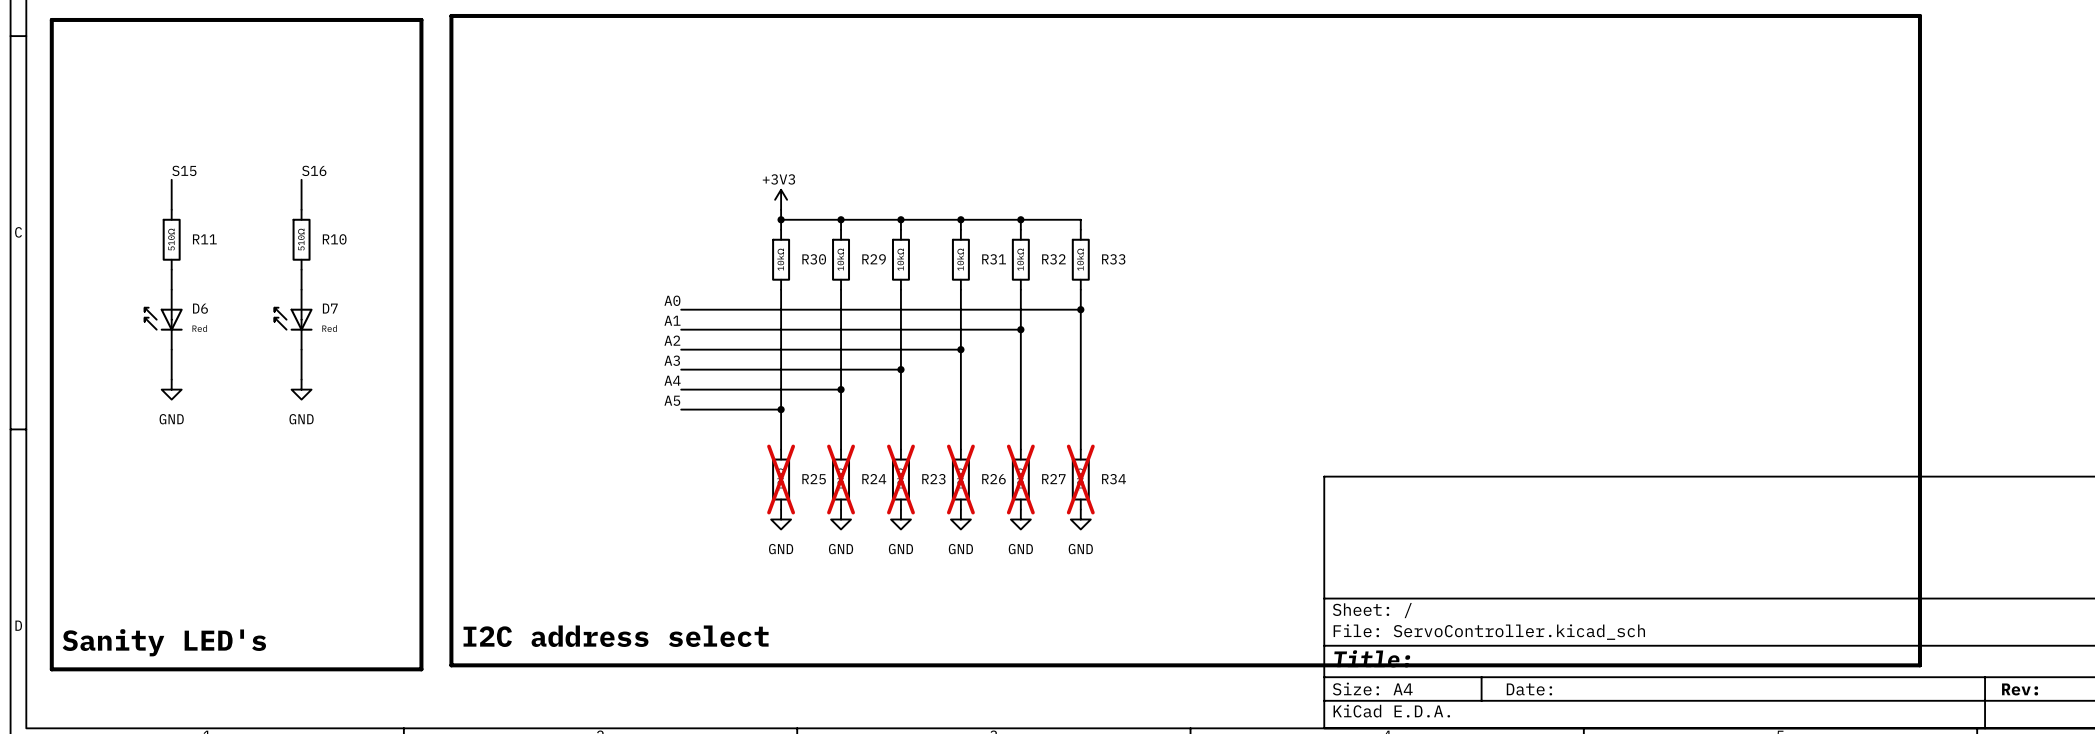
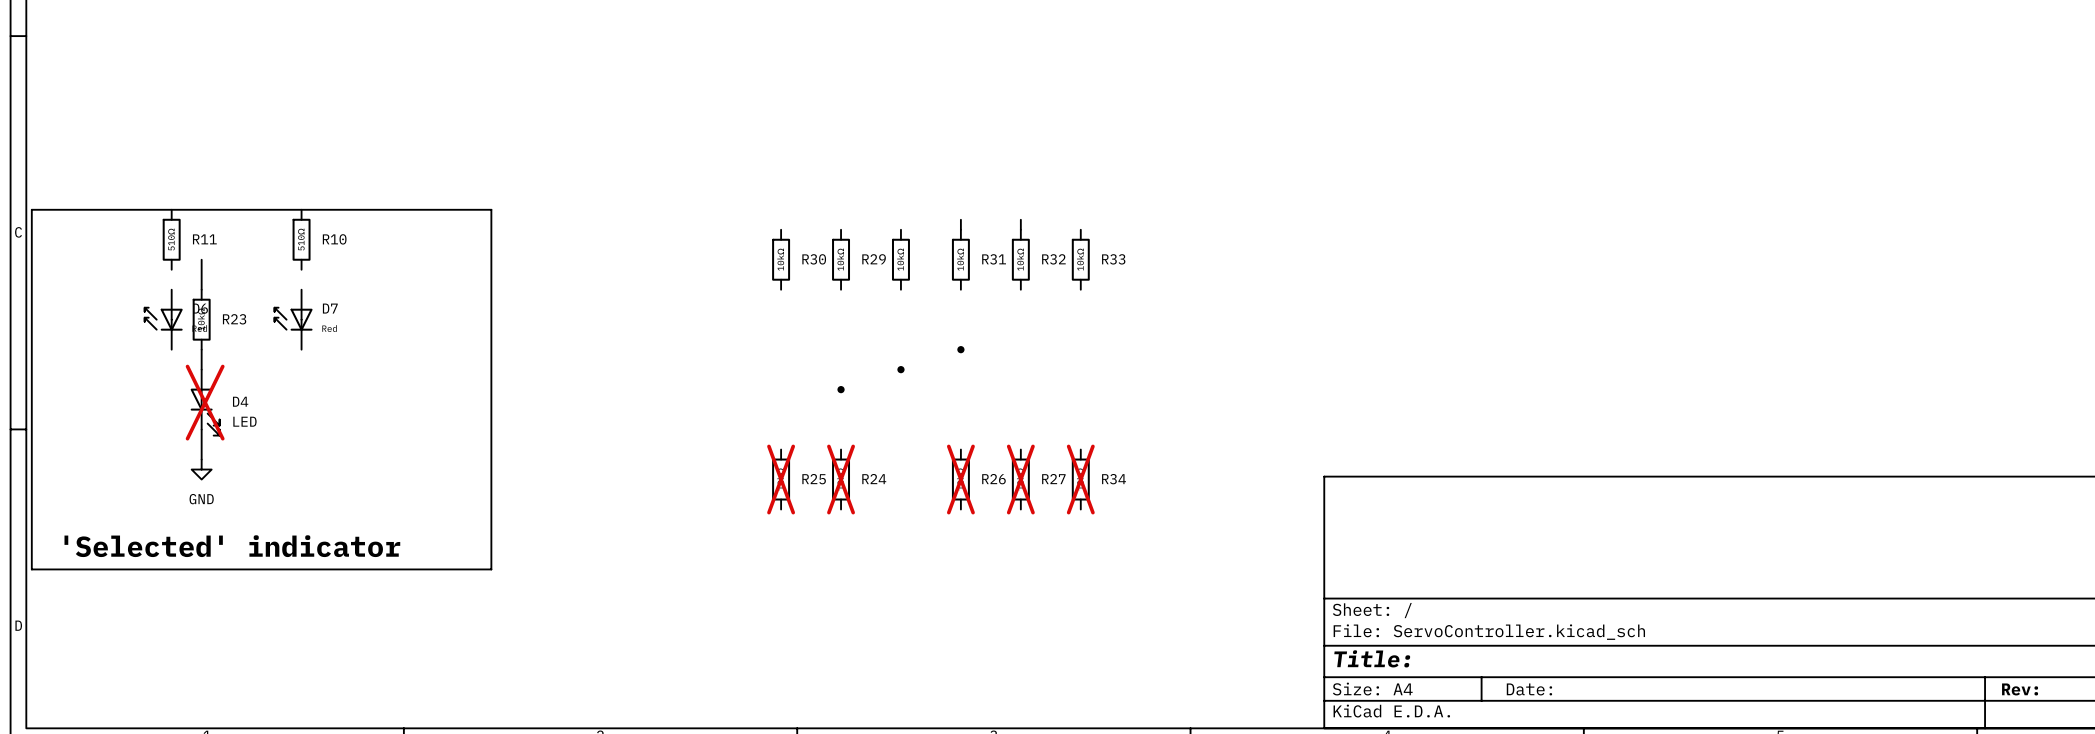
line: (451, 15) (1919, 15) (1919, 665) (451, 665) (451, 15) -> none
line: (51, 19) (421, 19) (421, 669) (51, 669) (51, 19) -> none
label: S15 (184, 170) -> none
label: S16 (314, 170) -> none
wire: (171, 179) (171, 209) -> (201, 259) (201, 289)
wire: (301, 179) (301, 209) -> none
power symbol: +3V3 (781, 199) -> none
line: none -> (31, 209) (491, 209) (491, 569) (31, 569) (31, 209)
wire: (781, 209) (781, 229) -> none
wire: (781, 219) (1080, 219) (1080, 229) -> none
junction: (781, 219) -> none
wire: (841, 219) (841, 229) -> none
junction: (841, 219) -> none
wire: (900, 219) (900, 229) -> none
junction: (900, 219) -> none
junction: (960, 219) -> none
junction: (1020, 219) -> none
wire: (171, 269) (171, 289) -> (201, 349) (201, 369)
wire: (301, 269) (301, 289) -> none
wire: (781, 289) (781, 449) -> none
wire: (841, 289) (841, 449) -> none
wire: (900, 289) (900, 449) -> none
wire: (960, 289) (960, 449) -> none
wire: (1020, 289) (1020, 449) -> none
wire: (1080, 289) (1080, 449) -> none
label: A0 (672, 300) -> none
wire: (681, 309) (1080, 309) -> none
junction: (1080, 309) -> none
label: A1 (672, 320) -> none
wire: (681, 329) (1020, 329) -> none
junction: (1020, 329) -> none
label: A2 (672, 340) -> none
wire: (171, 349) (171, 379) -> (201, 429) (201, 459)
wire: (301, 349) (301, 379) -> none
wire: (681, 349) (960, 349) -> none
label: A3 (672, 360) -> none
wire: (681, 369) (900, 369) -> none
label: A4 (672, 380) -> none
power symbol: GND (171, 389) -> none
power symbol: GND (301, 389) -> none
wire: (681, 389) (841, 389) -> none
label: A5 (672, 400) -> none
D4: none -> LED (205, 402)
wire: (681, 409) (781, 409) -> none
junction: (781, 409) -> none
power symbol: none -> GND (201, 469)
R23 position: (900, 479) -> (201, 319)
R23 do-not-place cross: (900, 479) -> none
power symbol: GND (781, 519) -> none
power symbol: GND (841, 519) -> none
power symbol: GND (900, 519) -> none
power symbol: GND (960, 519) -> none
power symbol: GND (1020, 519) -> none
power symbol: GND (1080, 519) -> none
text: none -> 'Selected' indicator (232, 546)
text: I2C address select (616, 636) -> none
text: Sanity LED's (164, 642) -> none

